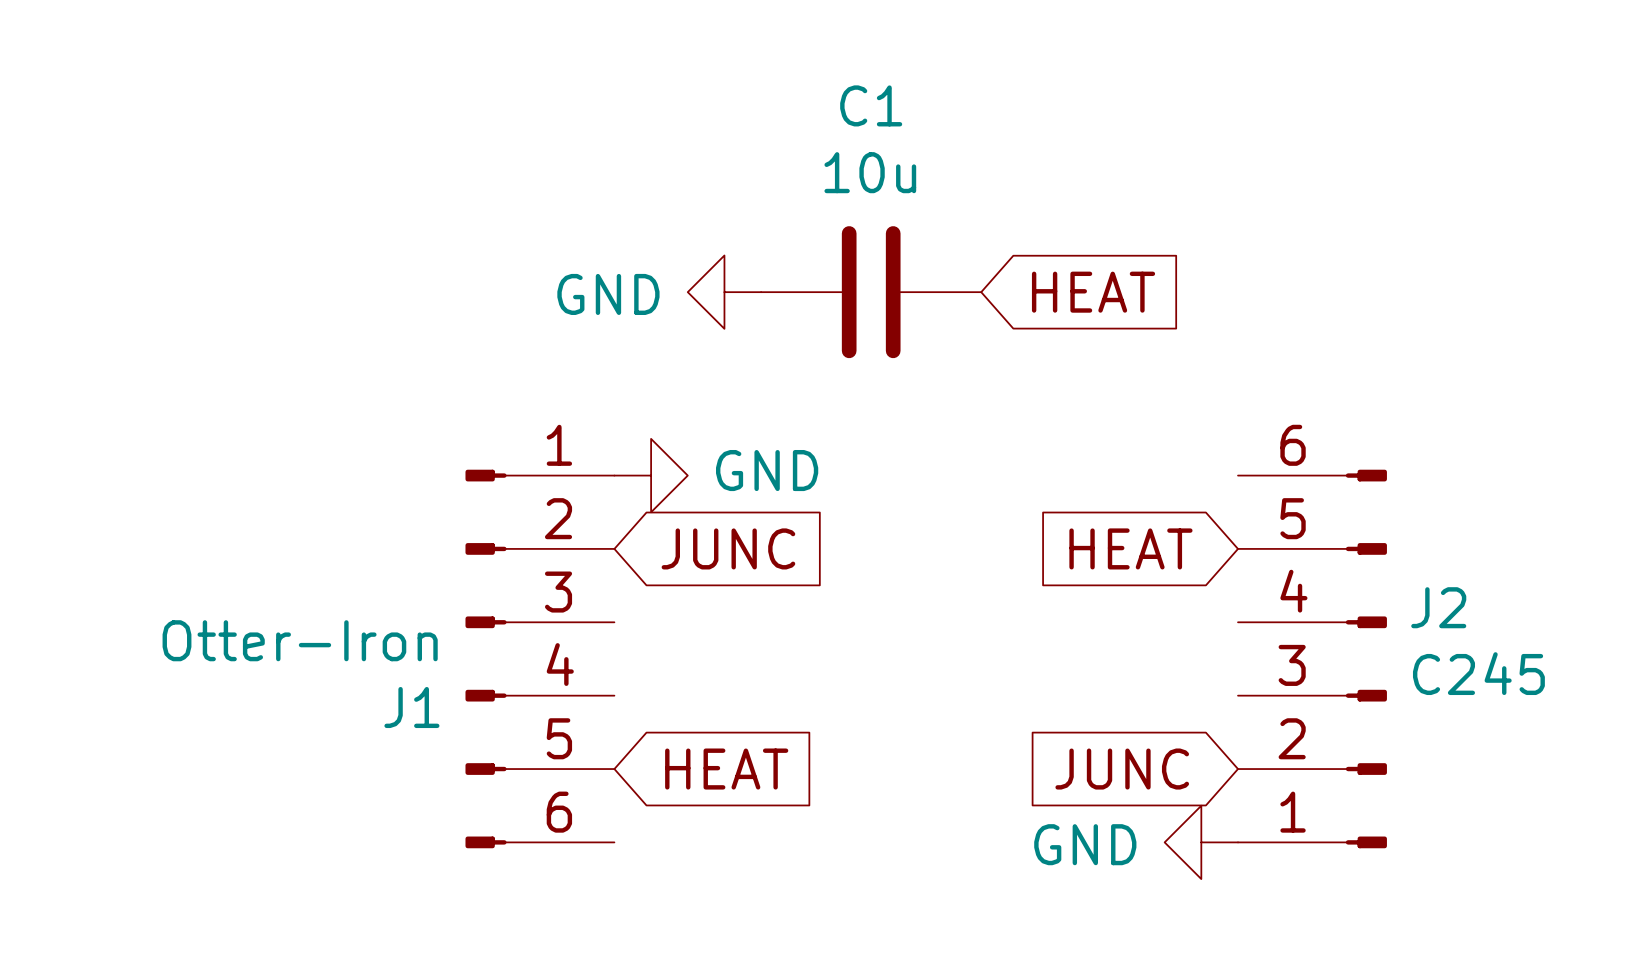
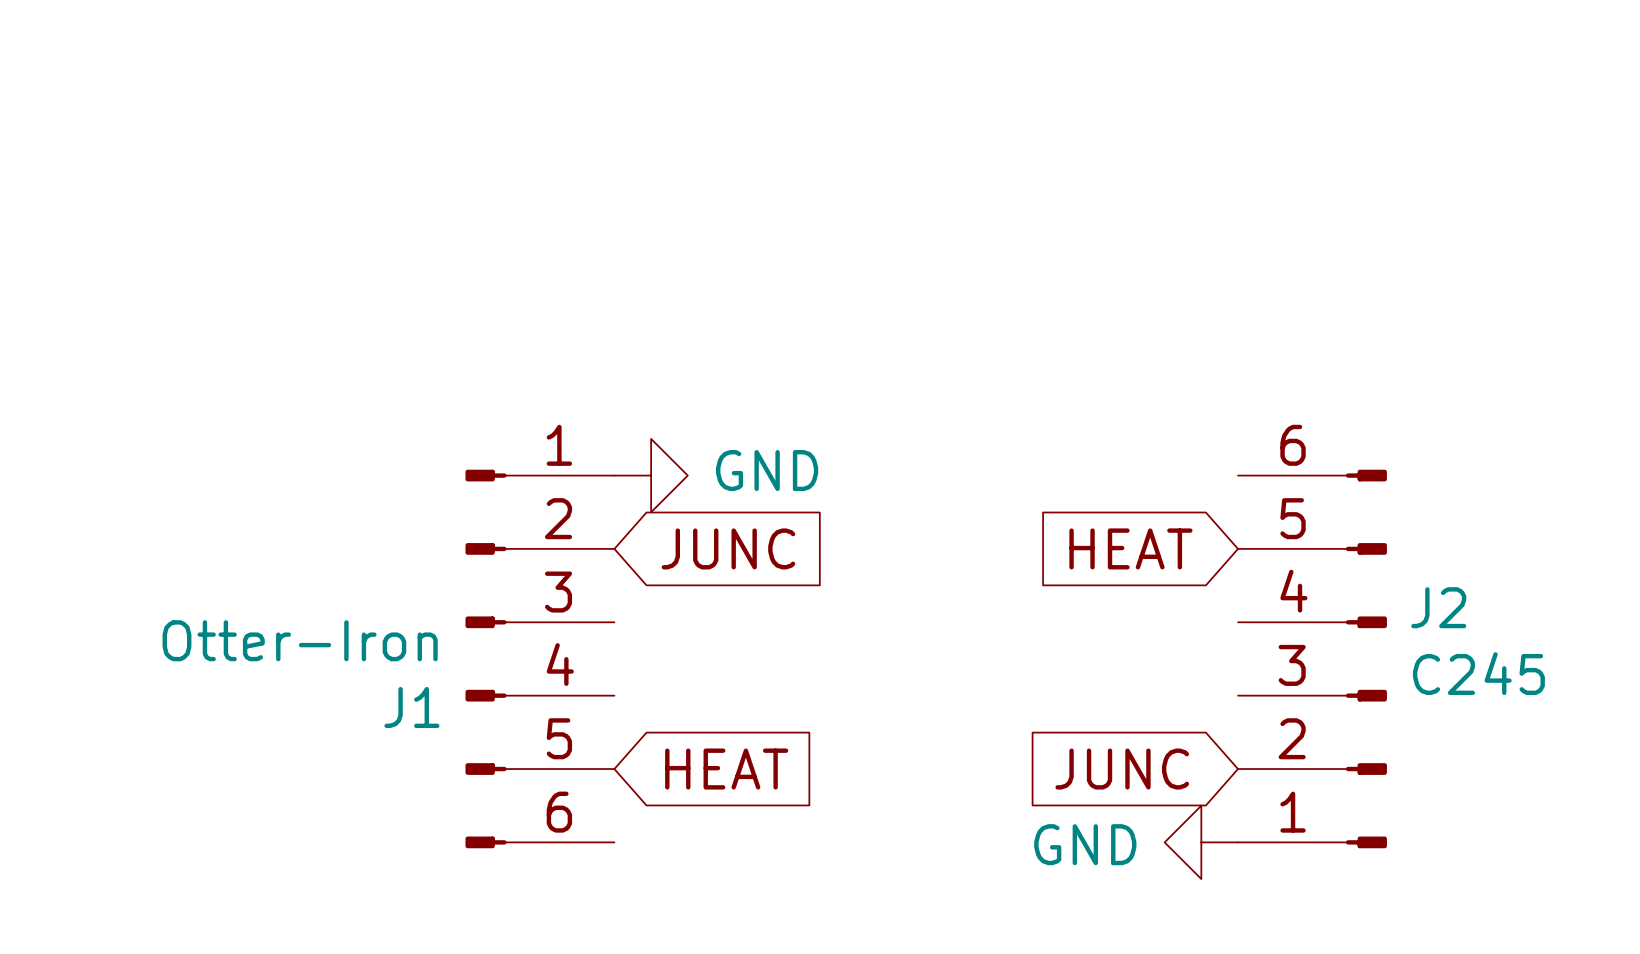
power symbol: GND (724, 292) -> none
C1: 10u (871, 292) -> none
global label: HEAT (1093, 292) -> none

